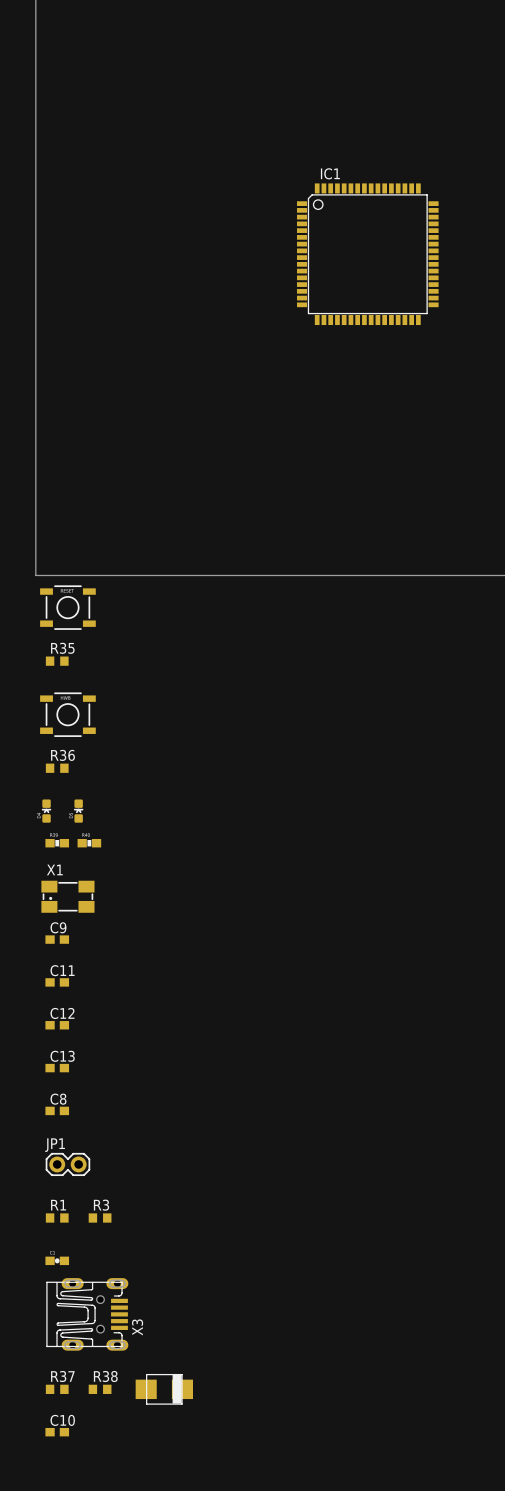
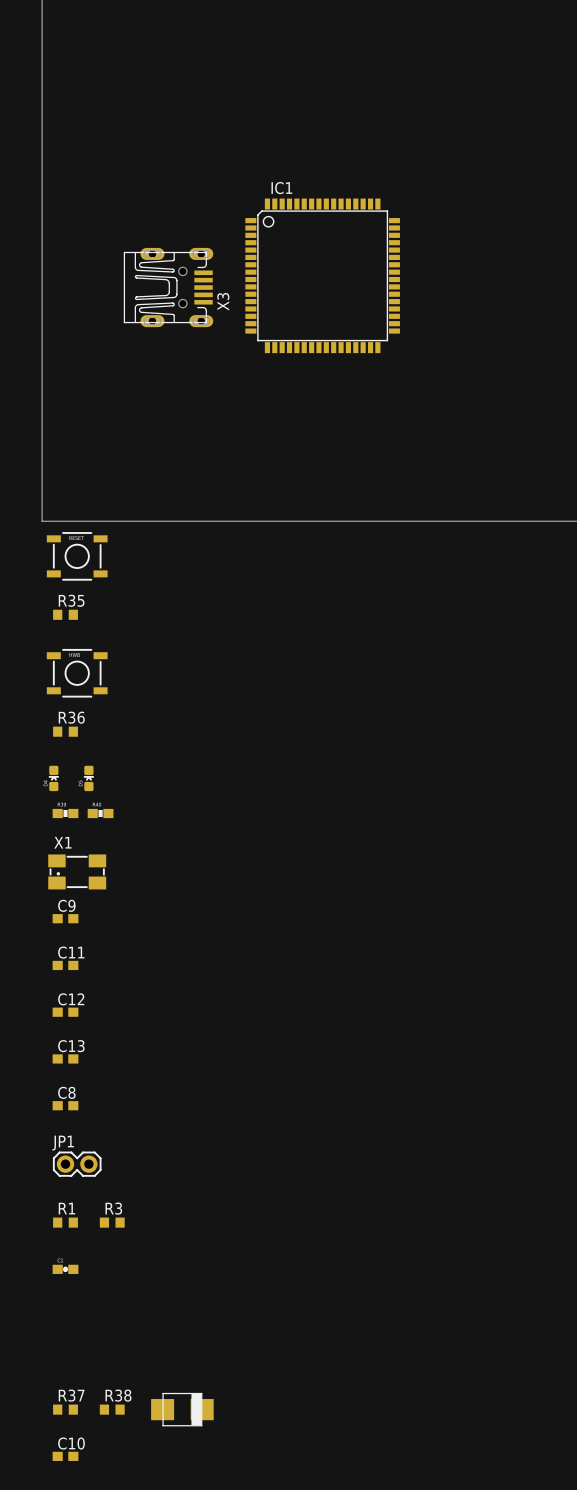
IC1 position: (367, 254) -> (322, 275)
X3 position: (87, 1314) -> (168, 287)

